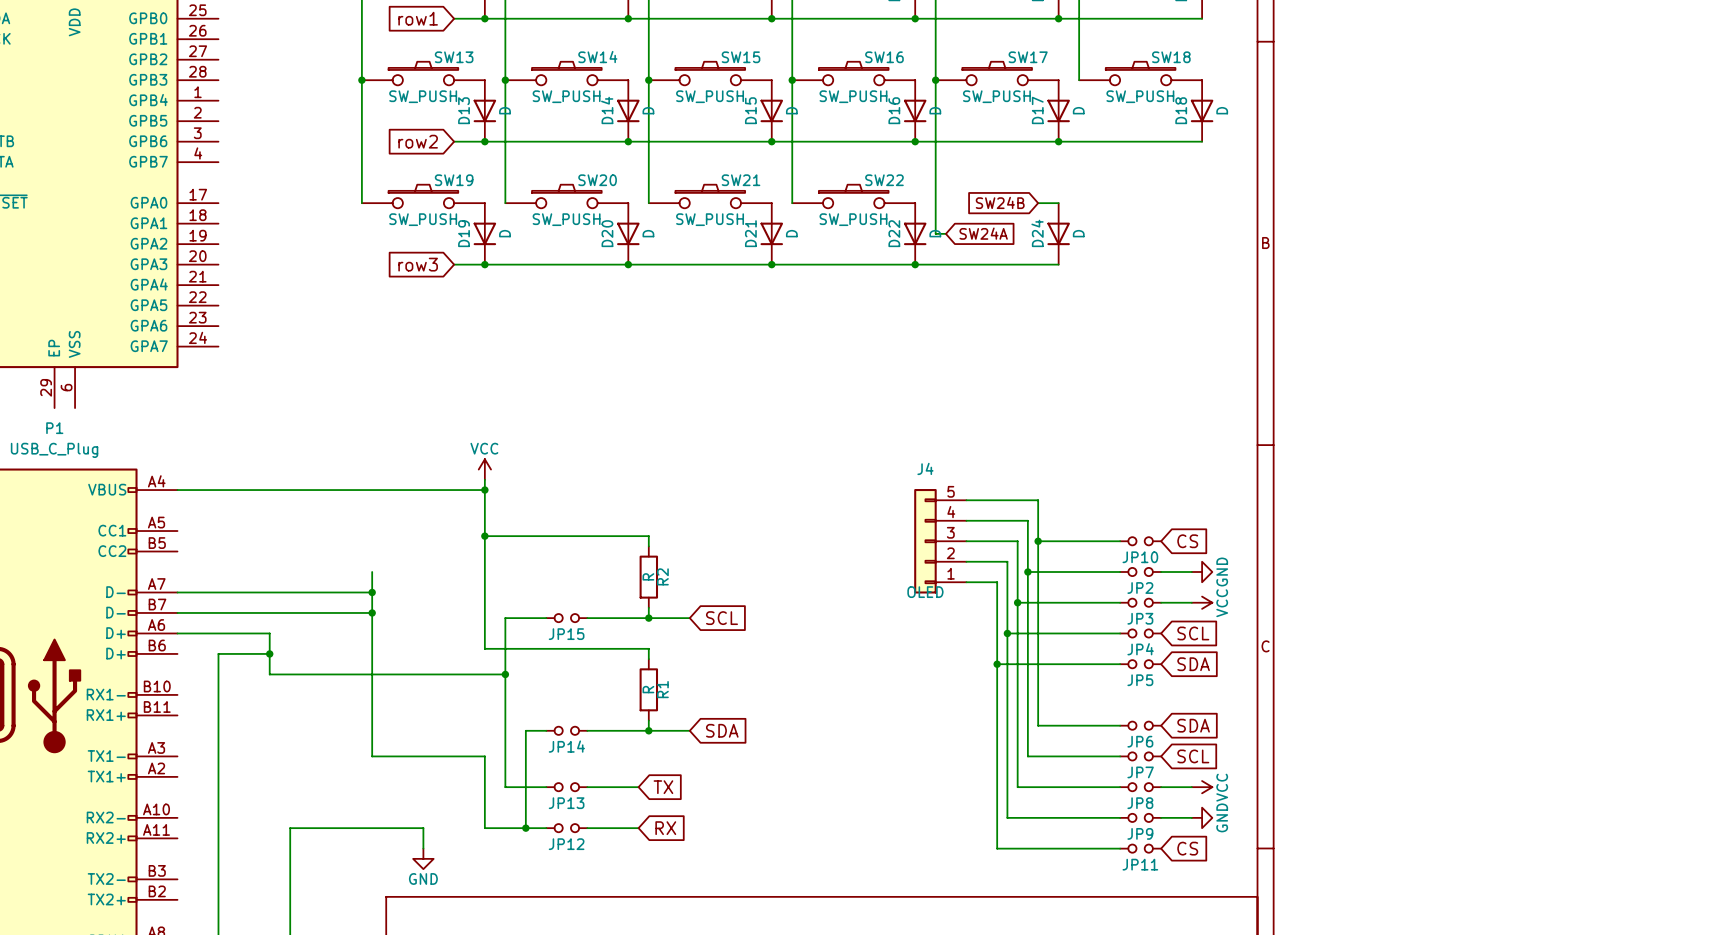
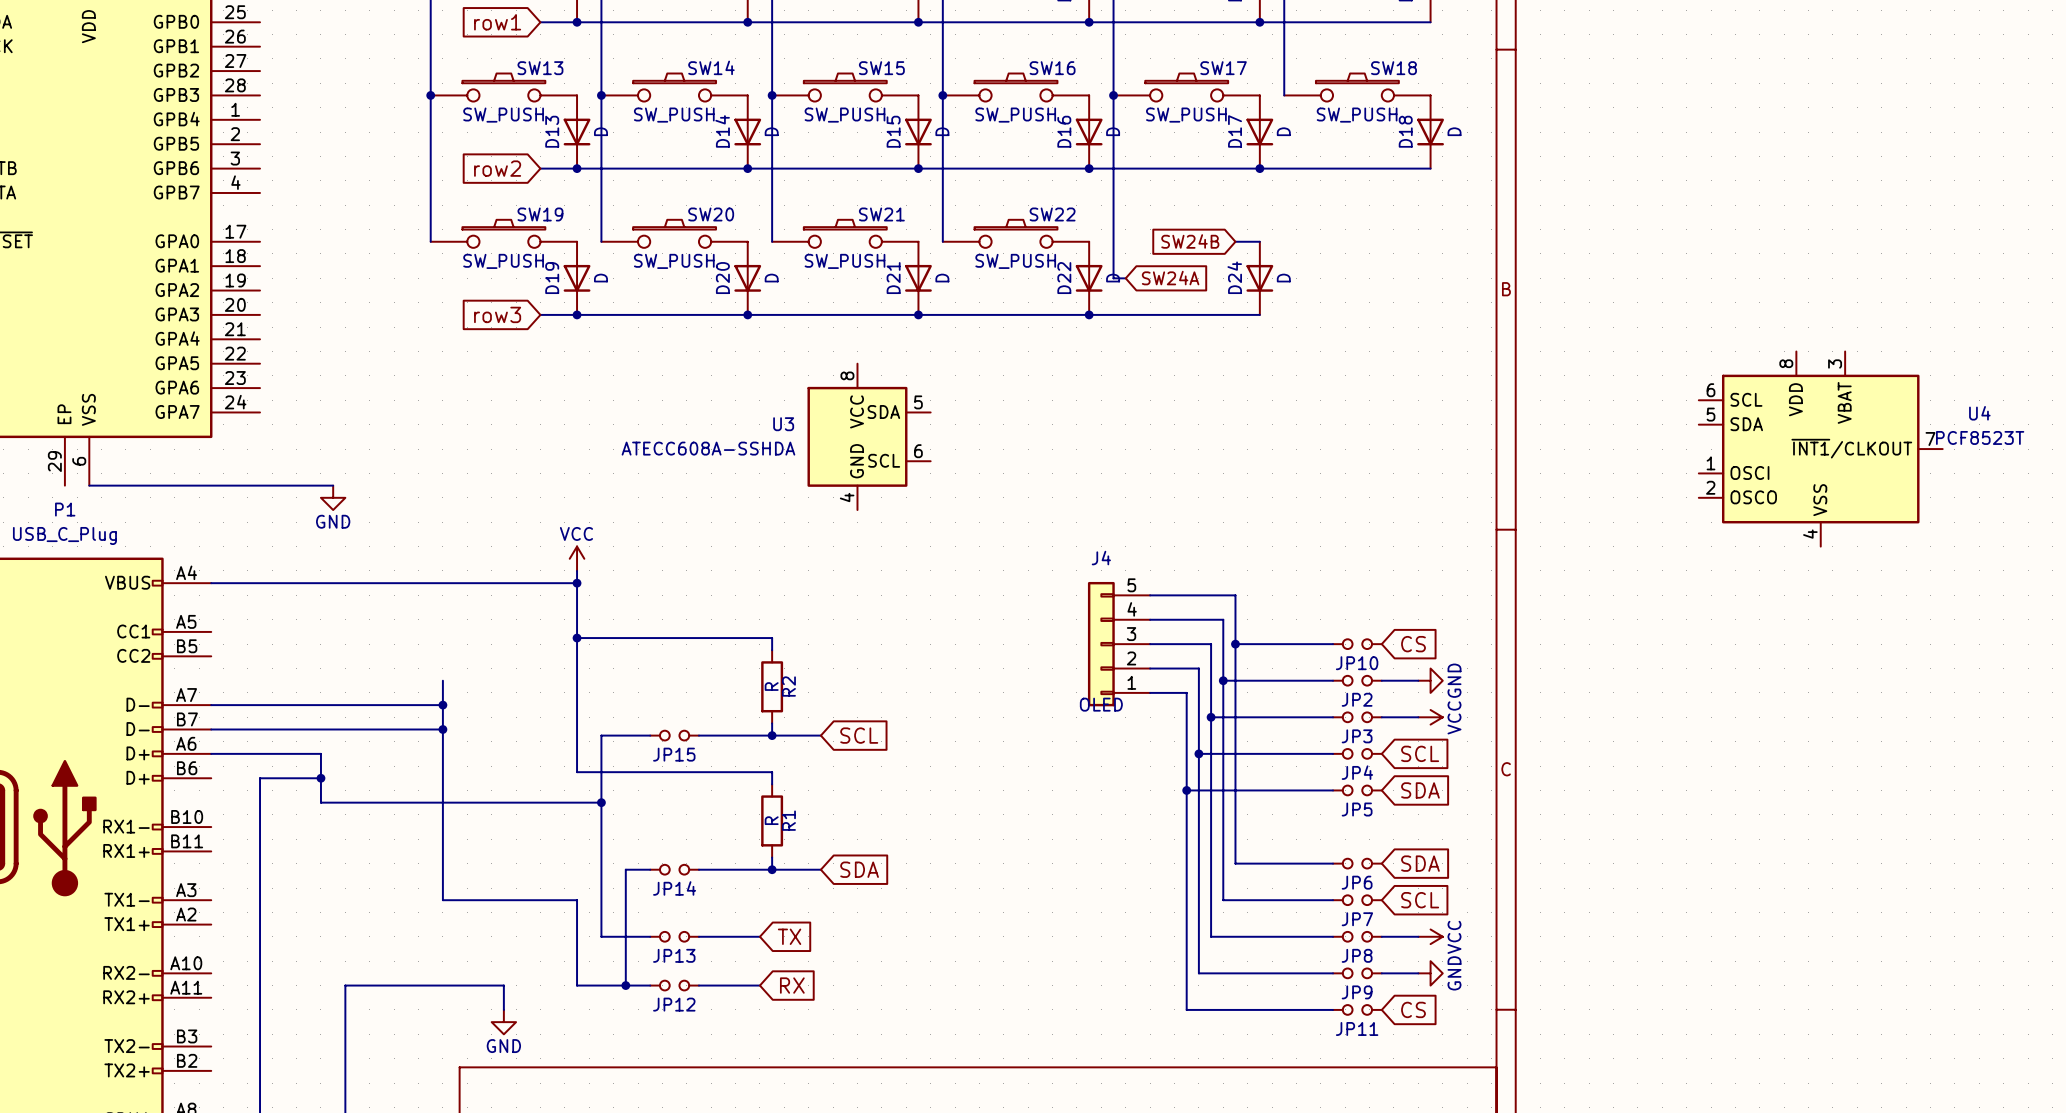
U3: none -> ATECC608A-SSHDA (869, 436)
U4: none -> PCF8523T (1820, 449)
wire: none -> (89, 485) (333, 485)
power symbol: none -> GND (333, 497)

